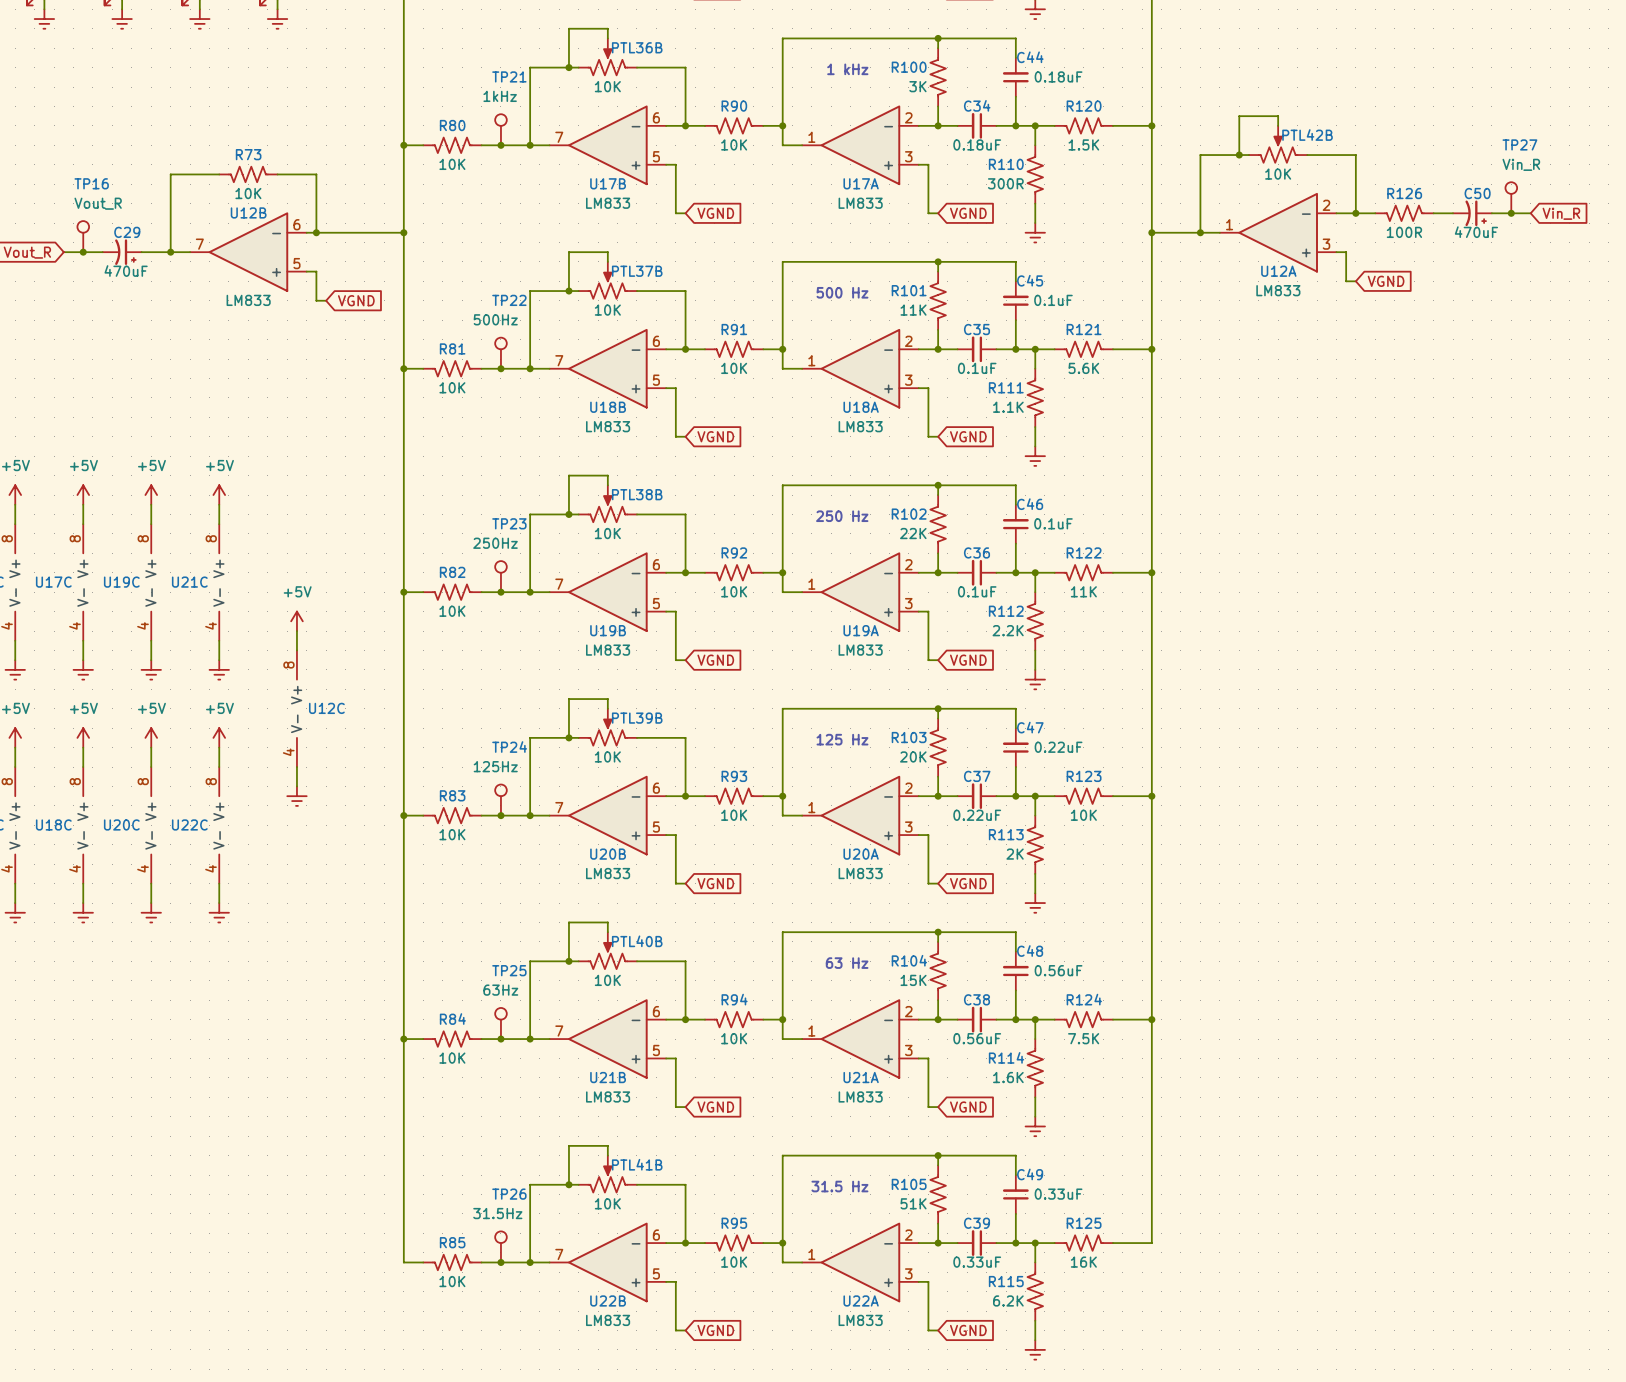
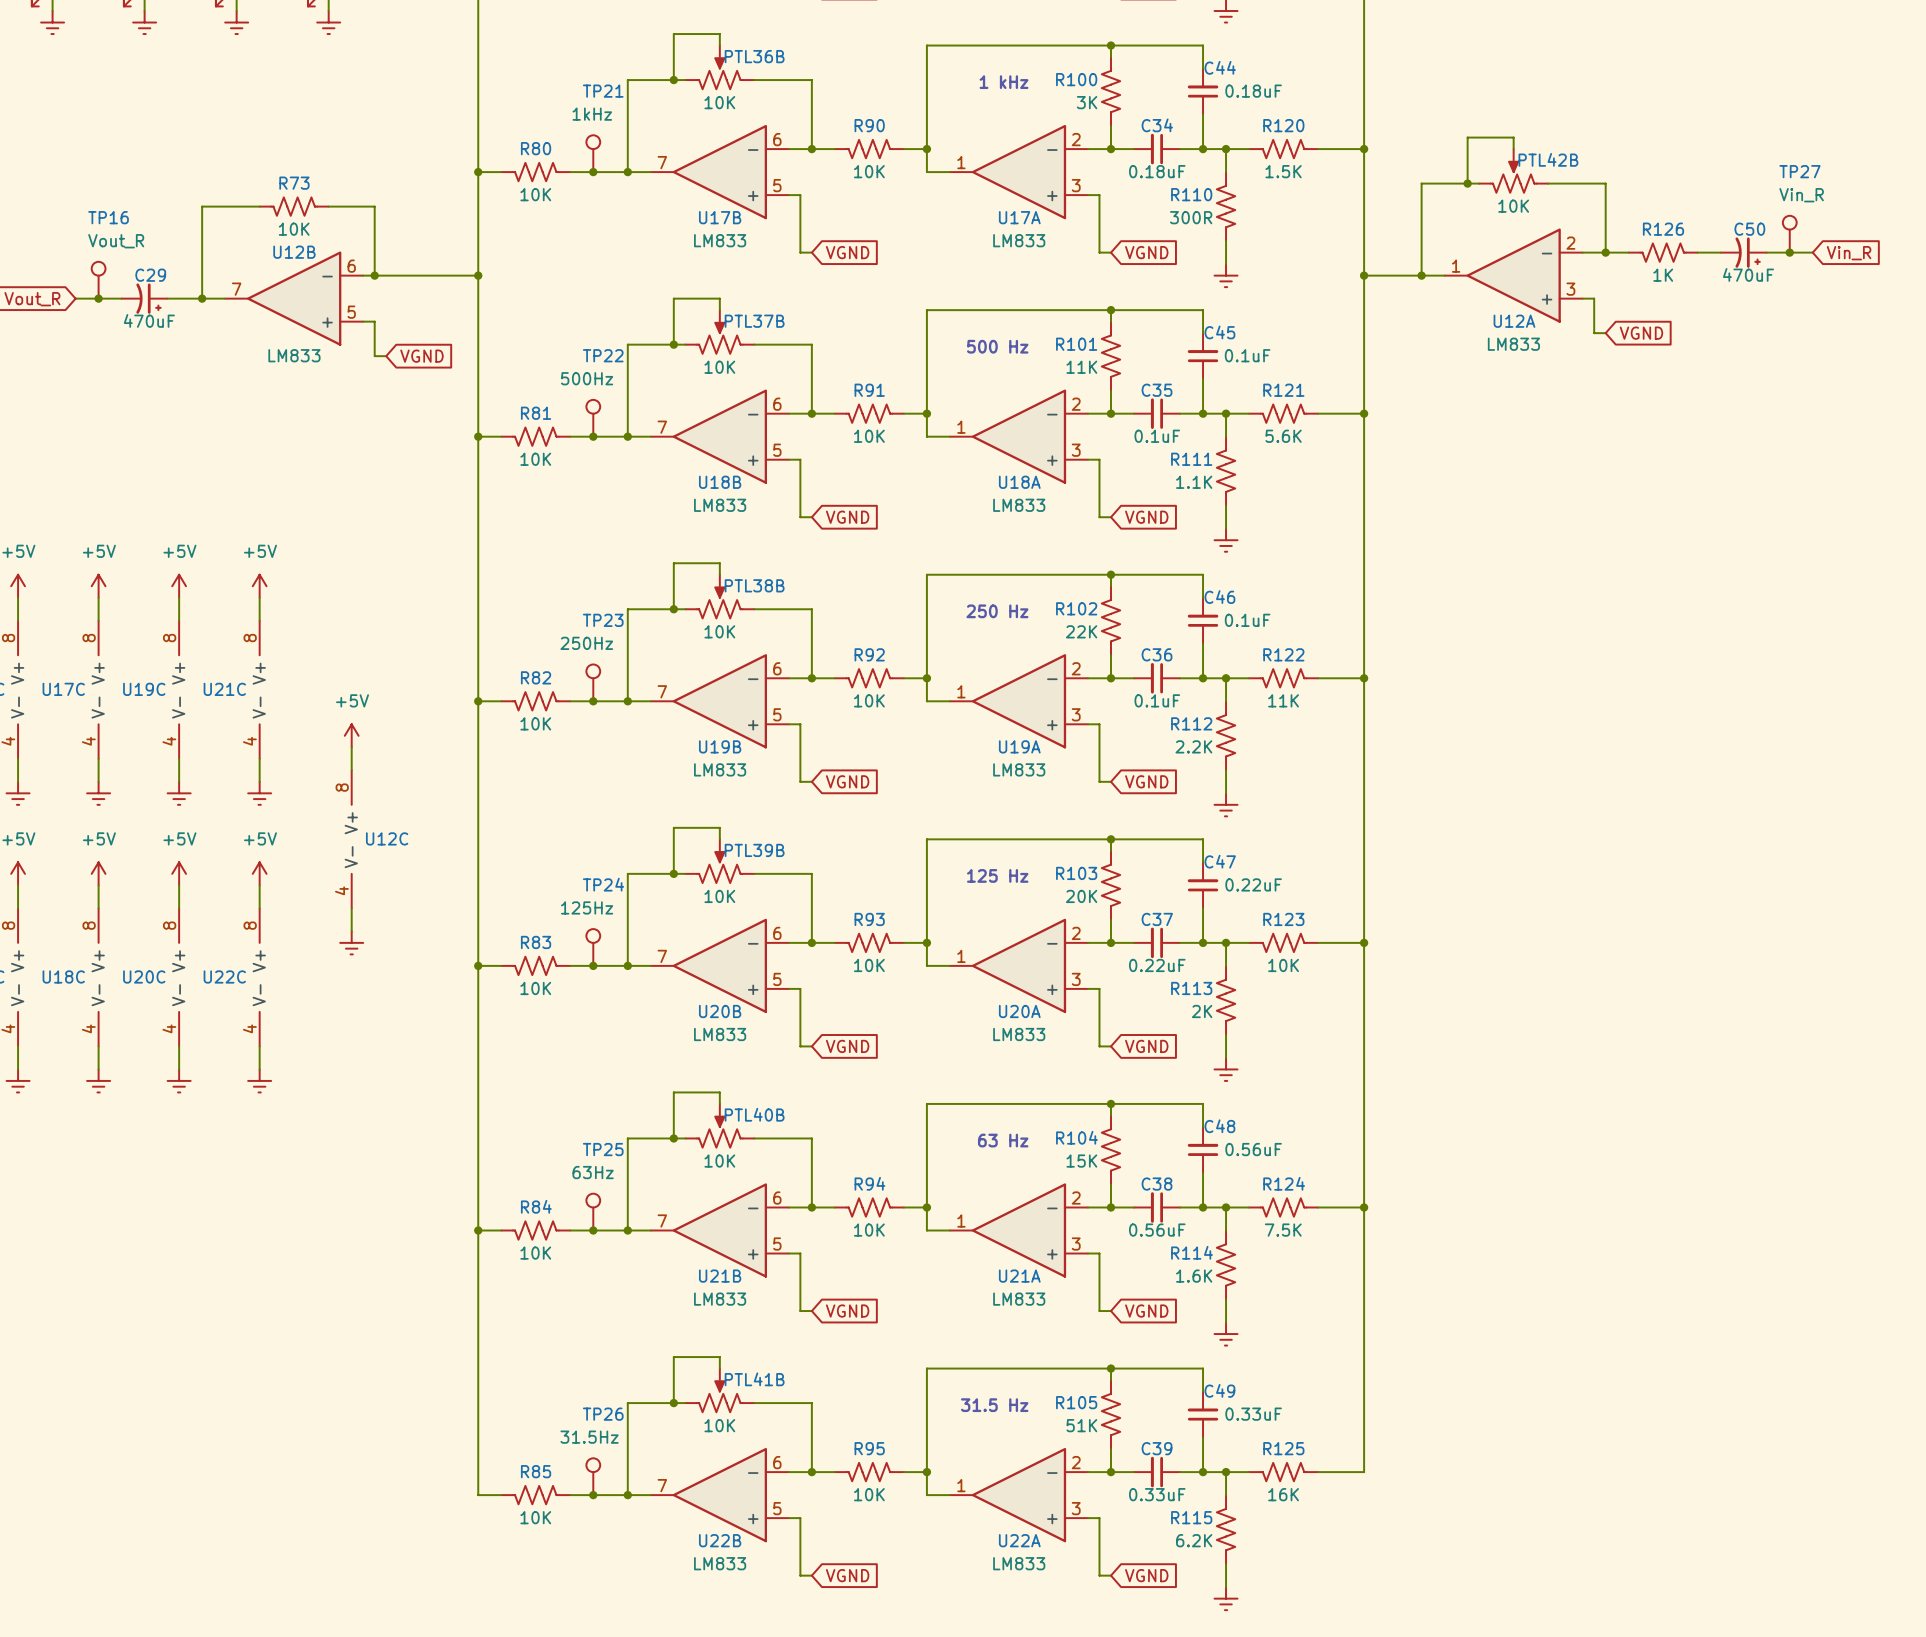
R126 value: 100R (1404, 232) -> 1K (1663, 275)

